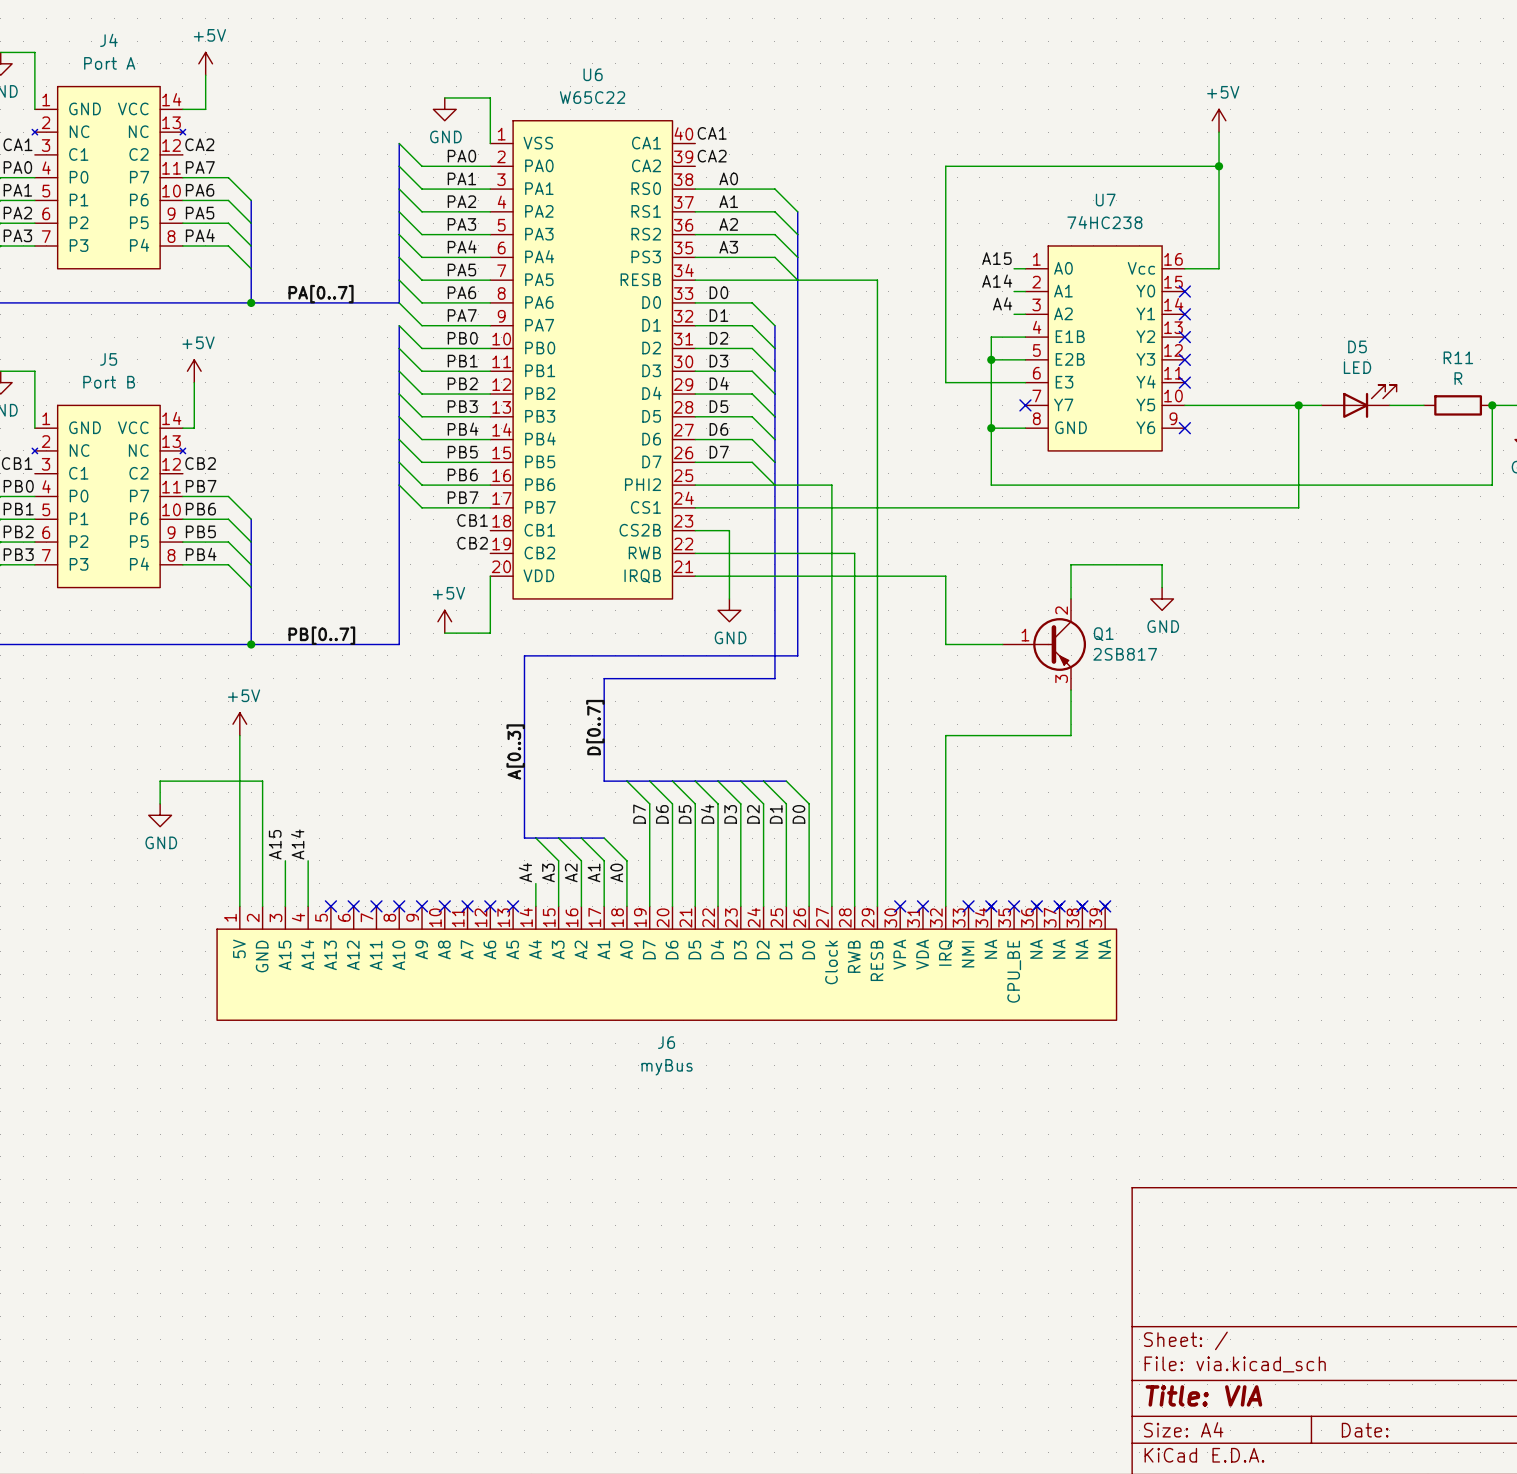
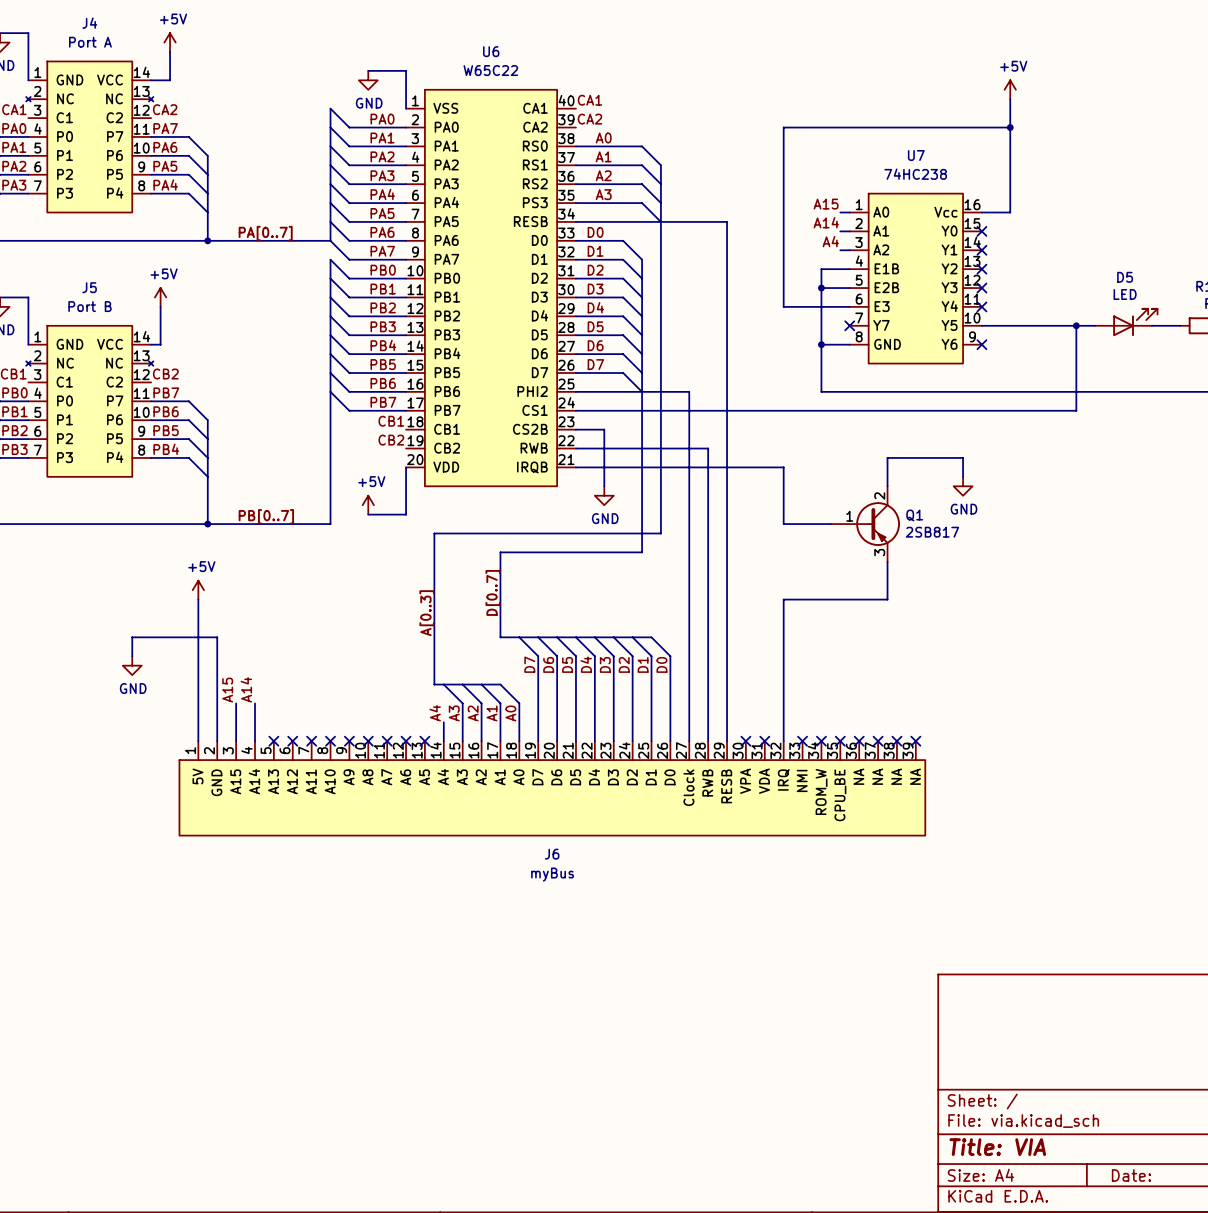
J6 symbol: [217, 903, 1117, 1021] -> [179, 741, 926, 836]

